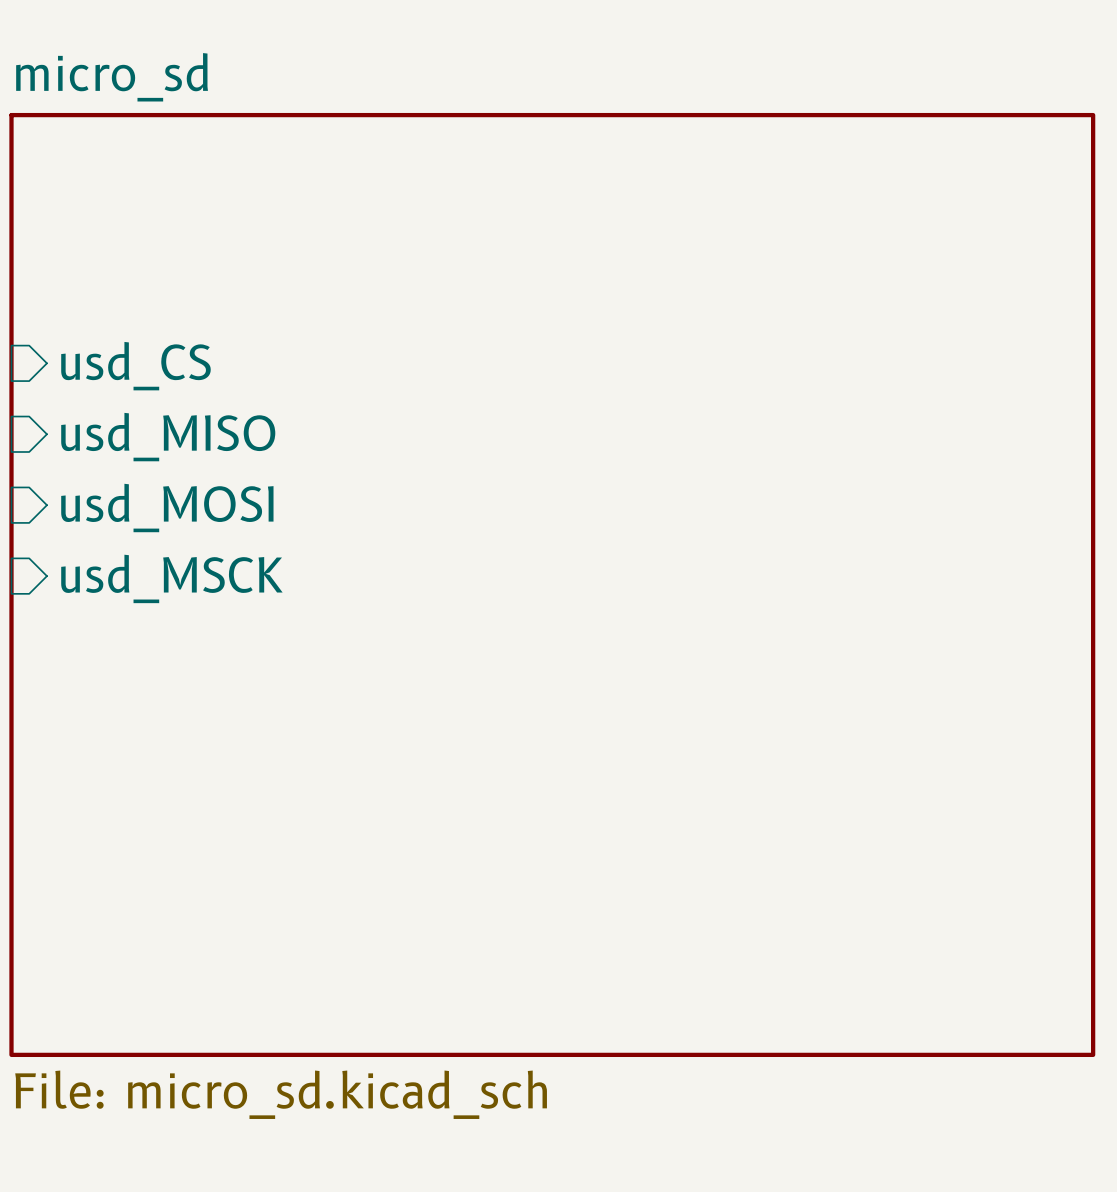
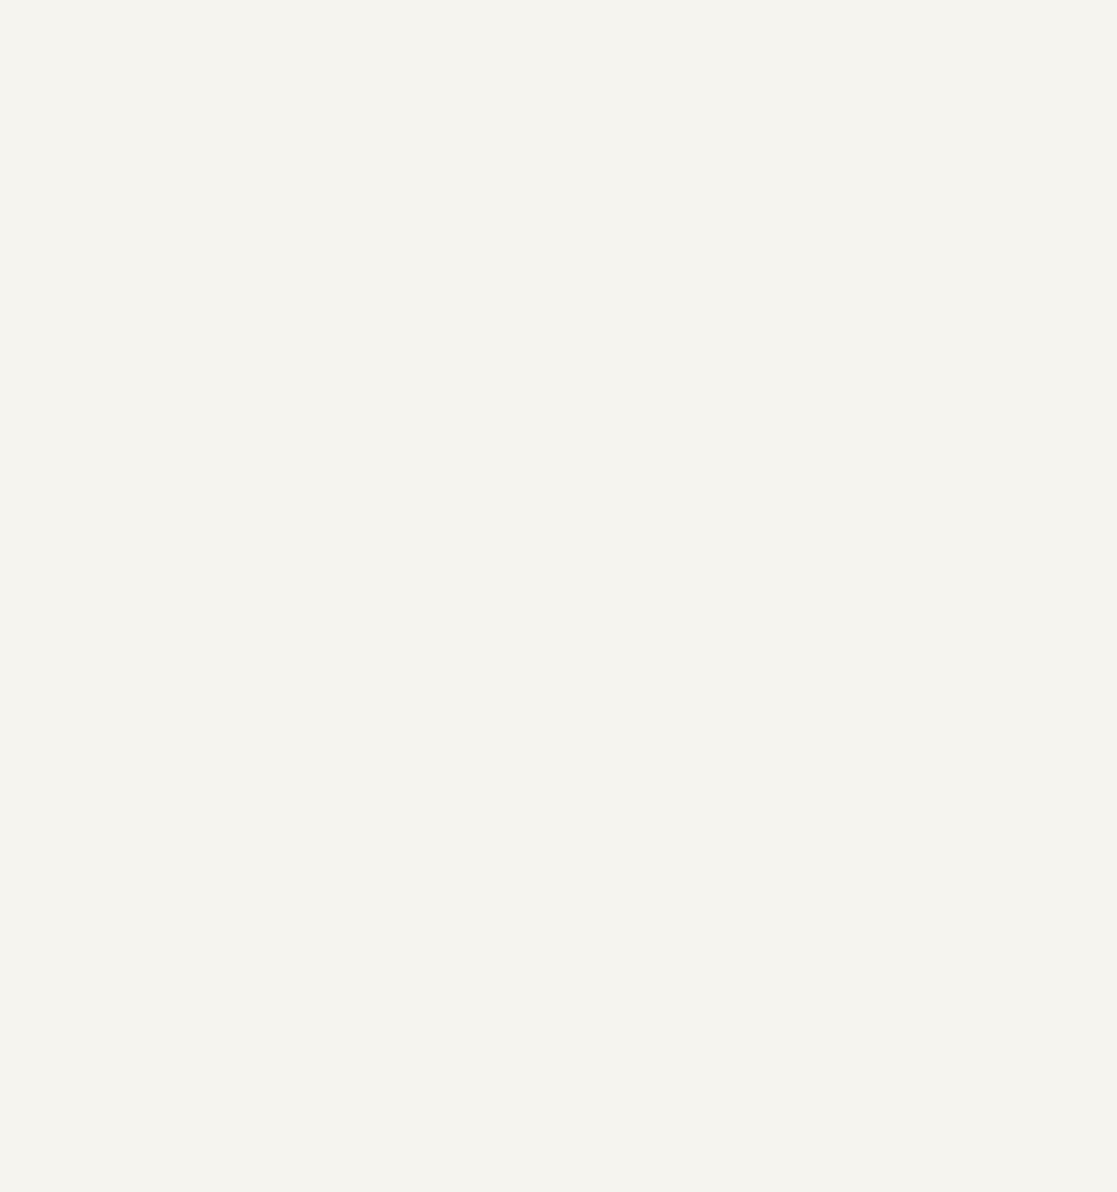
sheet pin: usd_CS (135, 366) -> none
sheet pin: usd_MISO (168, 437) -> none
sheet pin: usd_MOSI (167, 508) -> none
sheet pin: usd_MSCK (171, 578) -> none
sheet micro_sd: File: micro_sd.kicad_sch (552, 584) -> none

